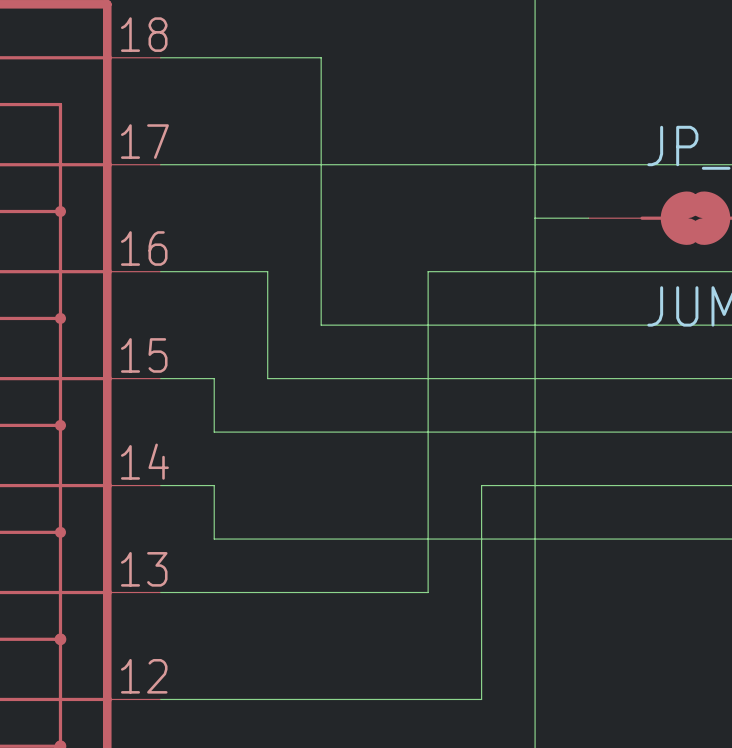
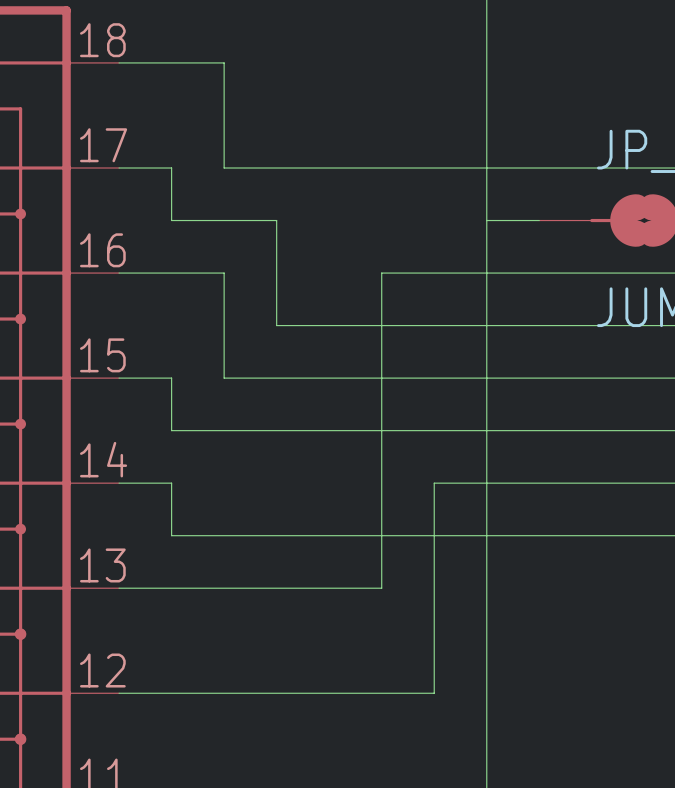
wire: (267, 57) (321, 57) (321, 218) -> (224, 62) (224, 168)
wire: (214, 164) (267, 164) -> (171, 168) (171, 220) (276, 220)

